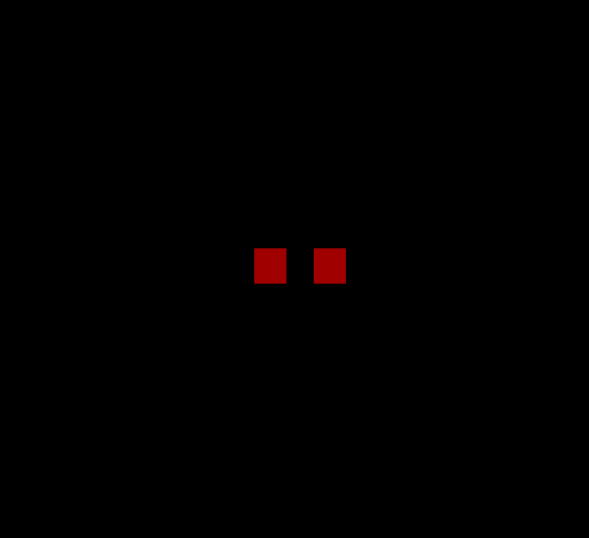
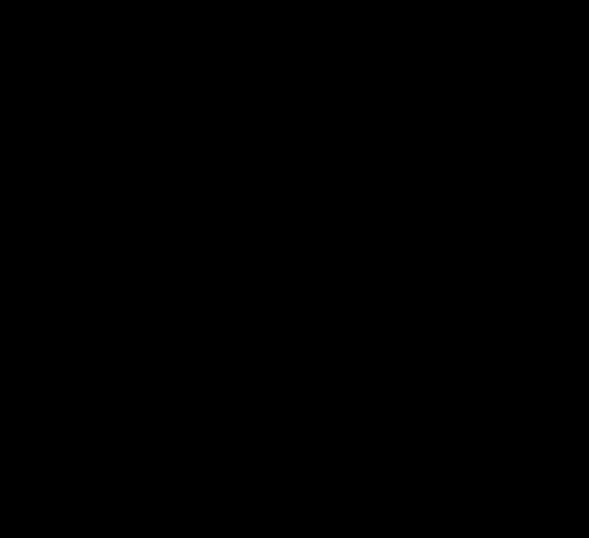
part: (300, 265) -> none

